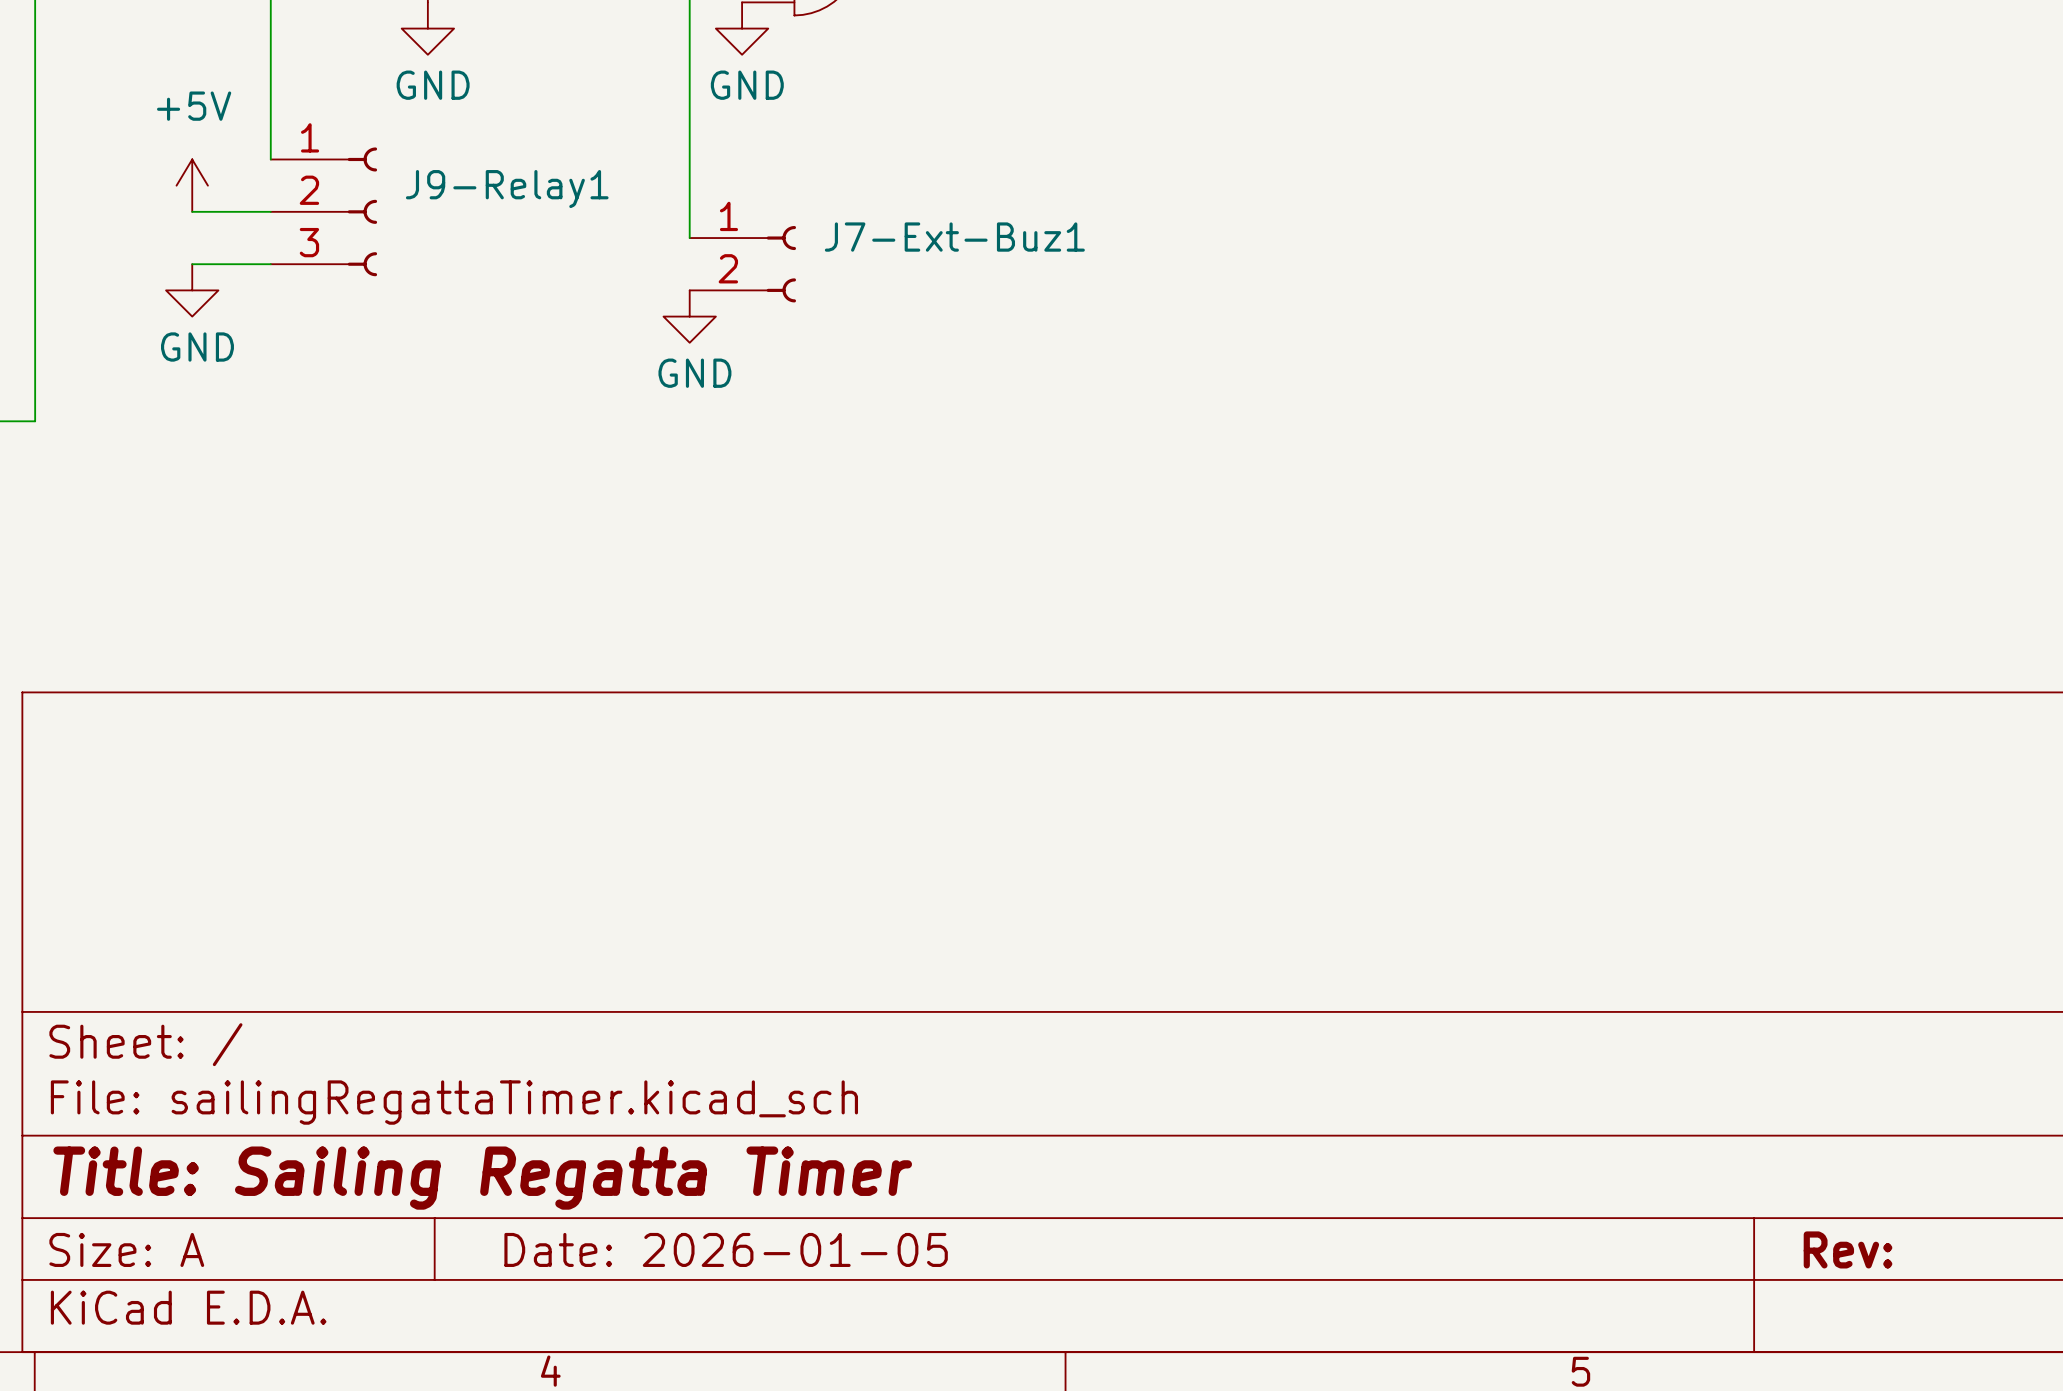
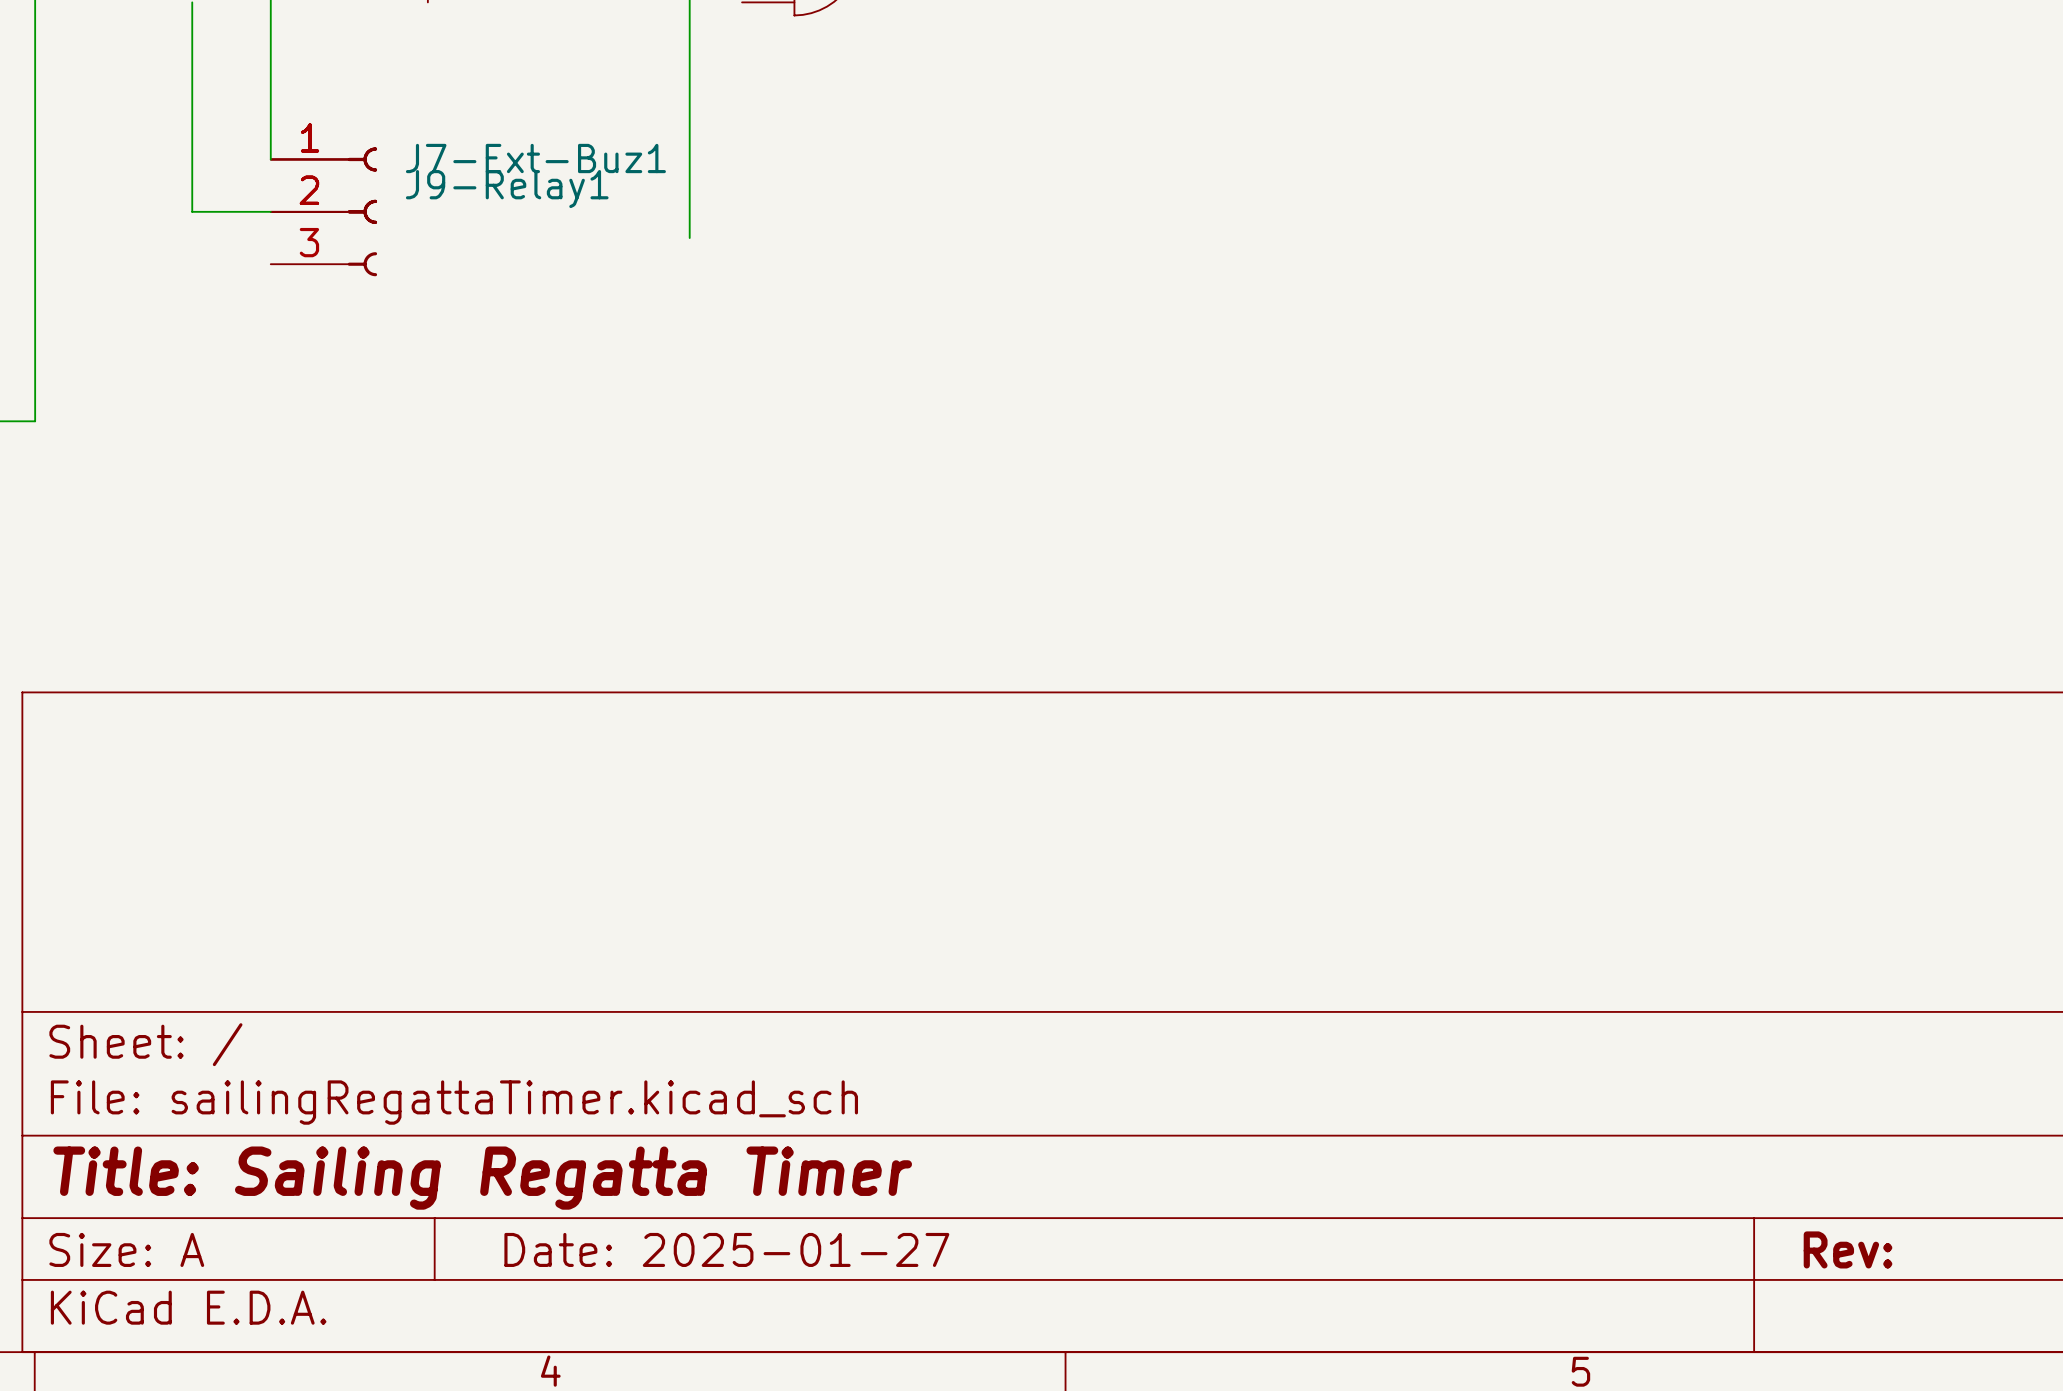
wire: none -> (192, 2) (192, 211)
power symbol: GND (427, 28) -> none
power symbol: GND (742, 28) -> none
power symbol: +5V (192, 185) -> none
wire: (192, 264) (270, 264) -> none
J7-Ext-Buz1 position: (742, 264) -> (323, 185)
power symbol: GND (192, 290) -> none
power symbol: GND (689, 316) -> none
title block: Date: 2026-01-05 (726, 1249) -> Date: 2025-01-27 (726, 1249)

